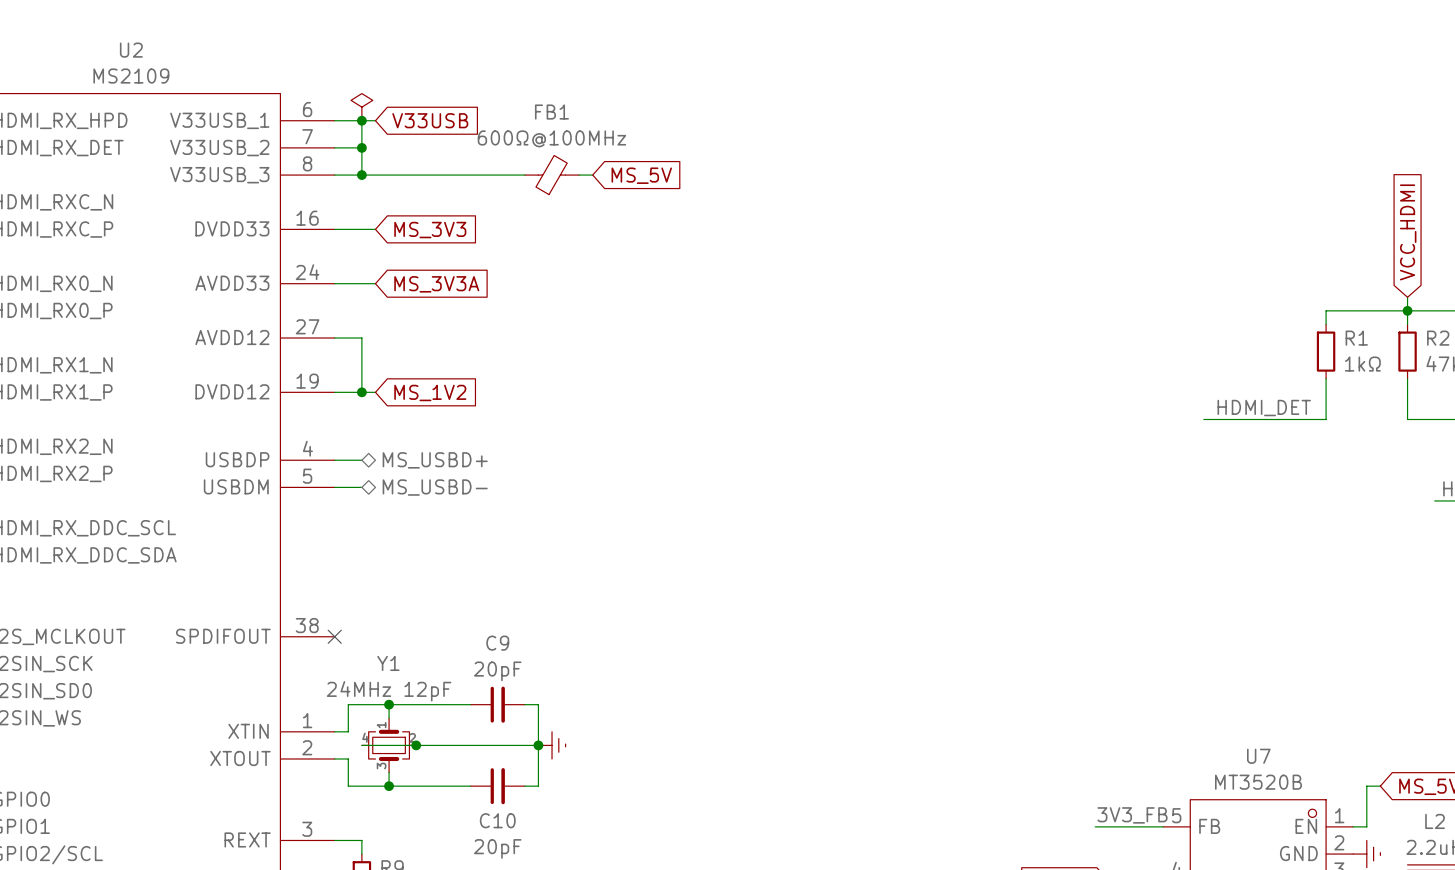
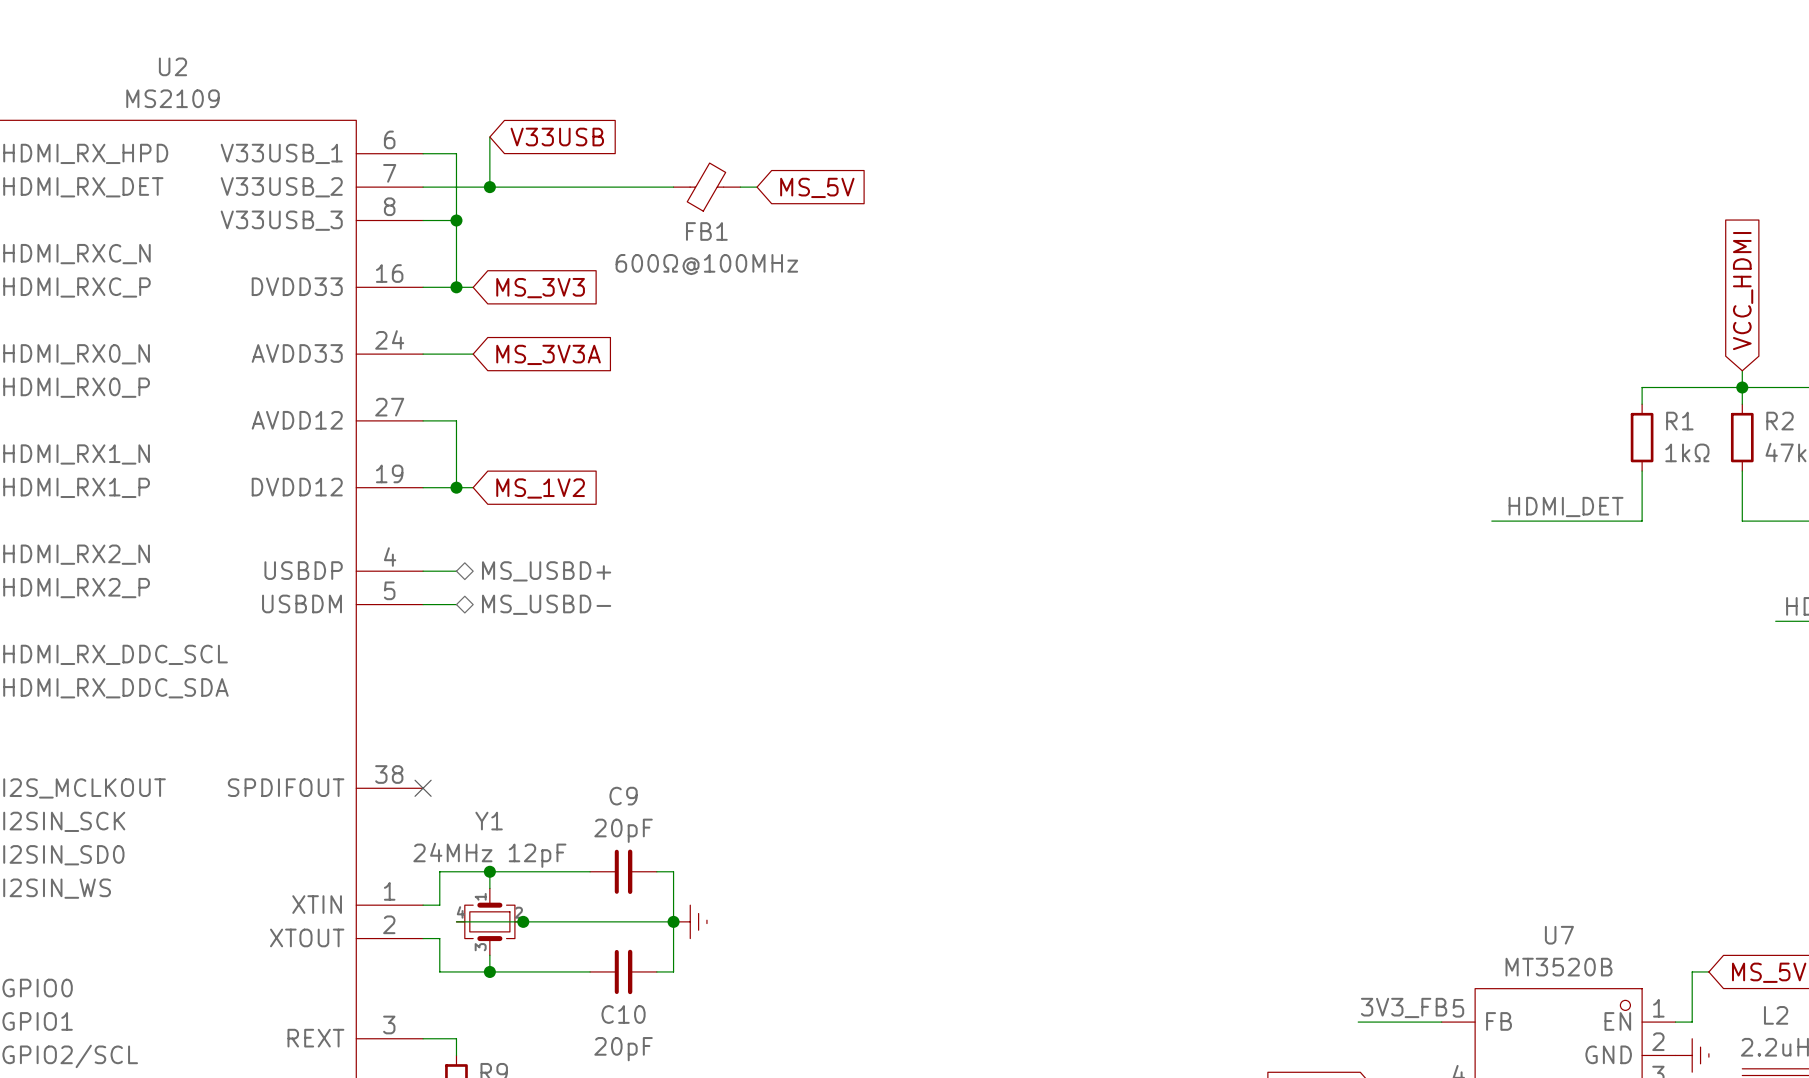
power symbol: (361, 107) -> none
wire: none -> (489, 137) (489, 187)
FB1 name position: FB1 (551, 112) -> FB1 (706, 231)
wire: (361, 120) (375, 120) -> none
junction: (361, 120) -> none
global label position: V33USB (430, 120) -> V33USB (557, 137)
FB1 value position: 600Ω@100MHz (551, 138) -> 600Ω@100MHz (706, 264)
wire: none -> (456, 187) (673, 187)
junction: (361, 147) -> none
junction: none -> (489, 187)
wire: (361, 175) (524, 175) -> (456, 220) (456, 287)
FB1 position: (552, 175) -> (706, 187)
wire: (579, 175) (592, 175) -> (740, 187) (757, 187)
global label position: MS_5V (641, 175) -> MS_5V (817, 187)
junction: none -> (456, 287)

